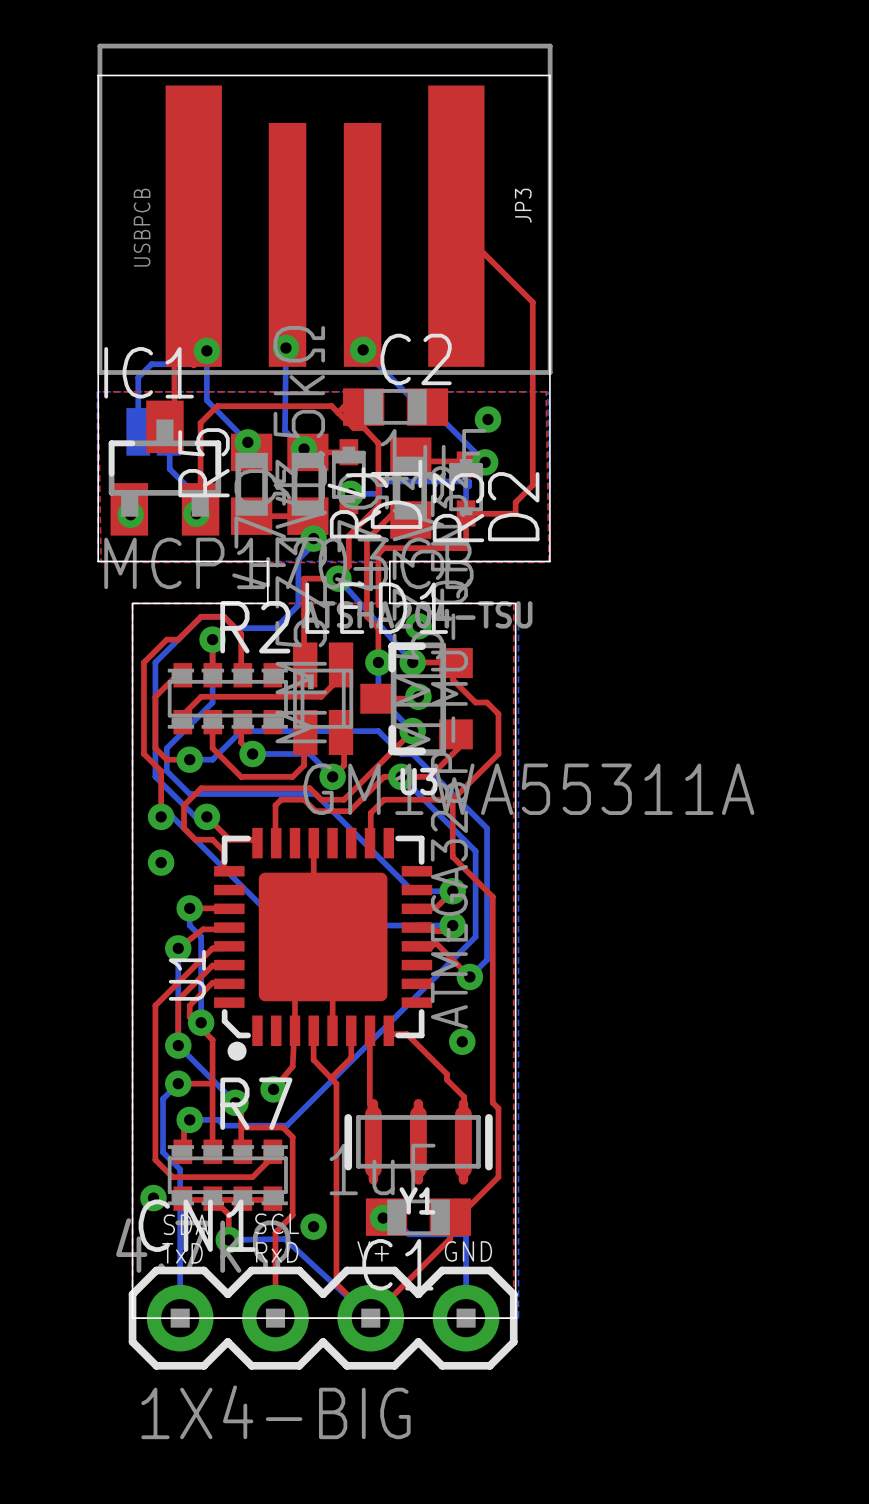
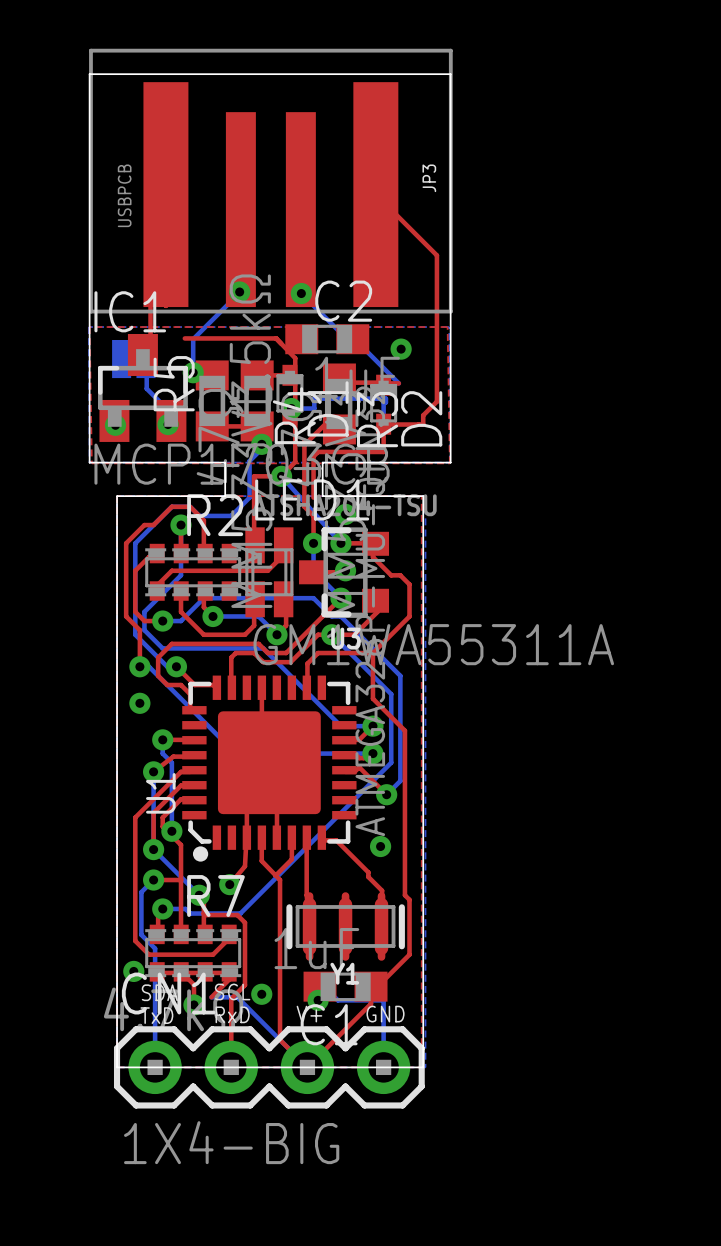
bottom track: (285, 348) (285, 430) (304, 449) -> none
via: (206, 350) -> none
bottom track: none -> (237, 295) (193, 339) (193, 372)
top track: (217, 406) (200, 422) (200, 509) (203, 512) (196, 513) -> none
top track: (363, 407) (343, 406) (338, 412) (353, 428) (364, 428) (378, 443) (378, 506) (348, 535) (348, 566) (338, 578) -> (276, 338) (295, 358) (295, 461) (281, 476)
bottom track: (138, 431) (138, 377) (151, 364) (193, 364) (206, 350) (206, 400) (247, 442) -> none
via position: (247, 442) -> (193, 372)
via: (304, 449) -> none
via: (485, 462) -> none
top track: none -> (229, 979) (211, 997)
via position: (383, 1218) -> (318, 1000)
bottom track: (228, 1240) (285, 1239) (370, 1318) -> (211, 997) (237, 997) (307, 1067)

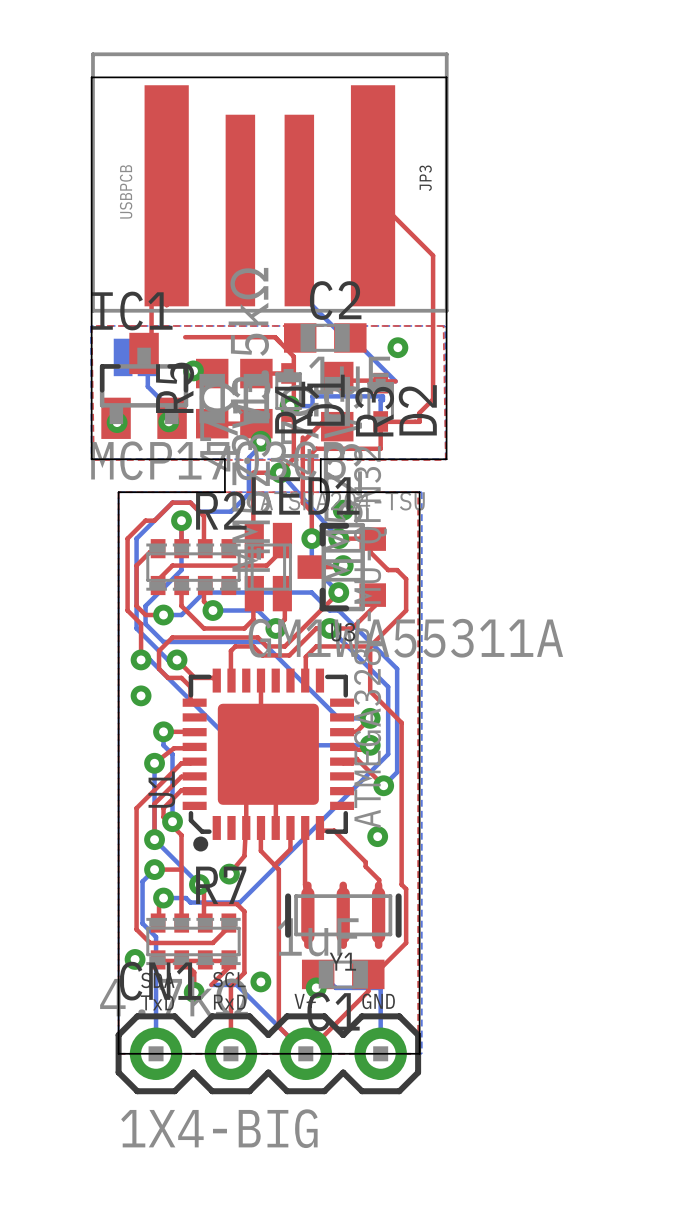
via: (239, 292) -> none
via: (301, 293) -> none
bottom track: (237, 295) (193, 339) (193, 372) -> none

